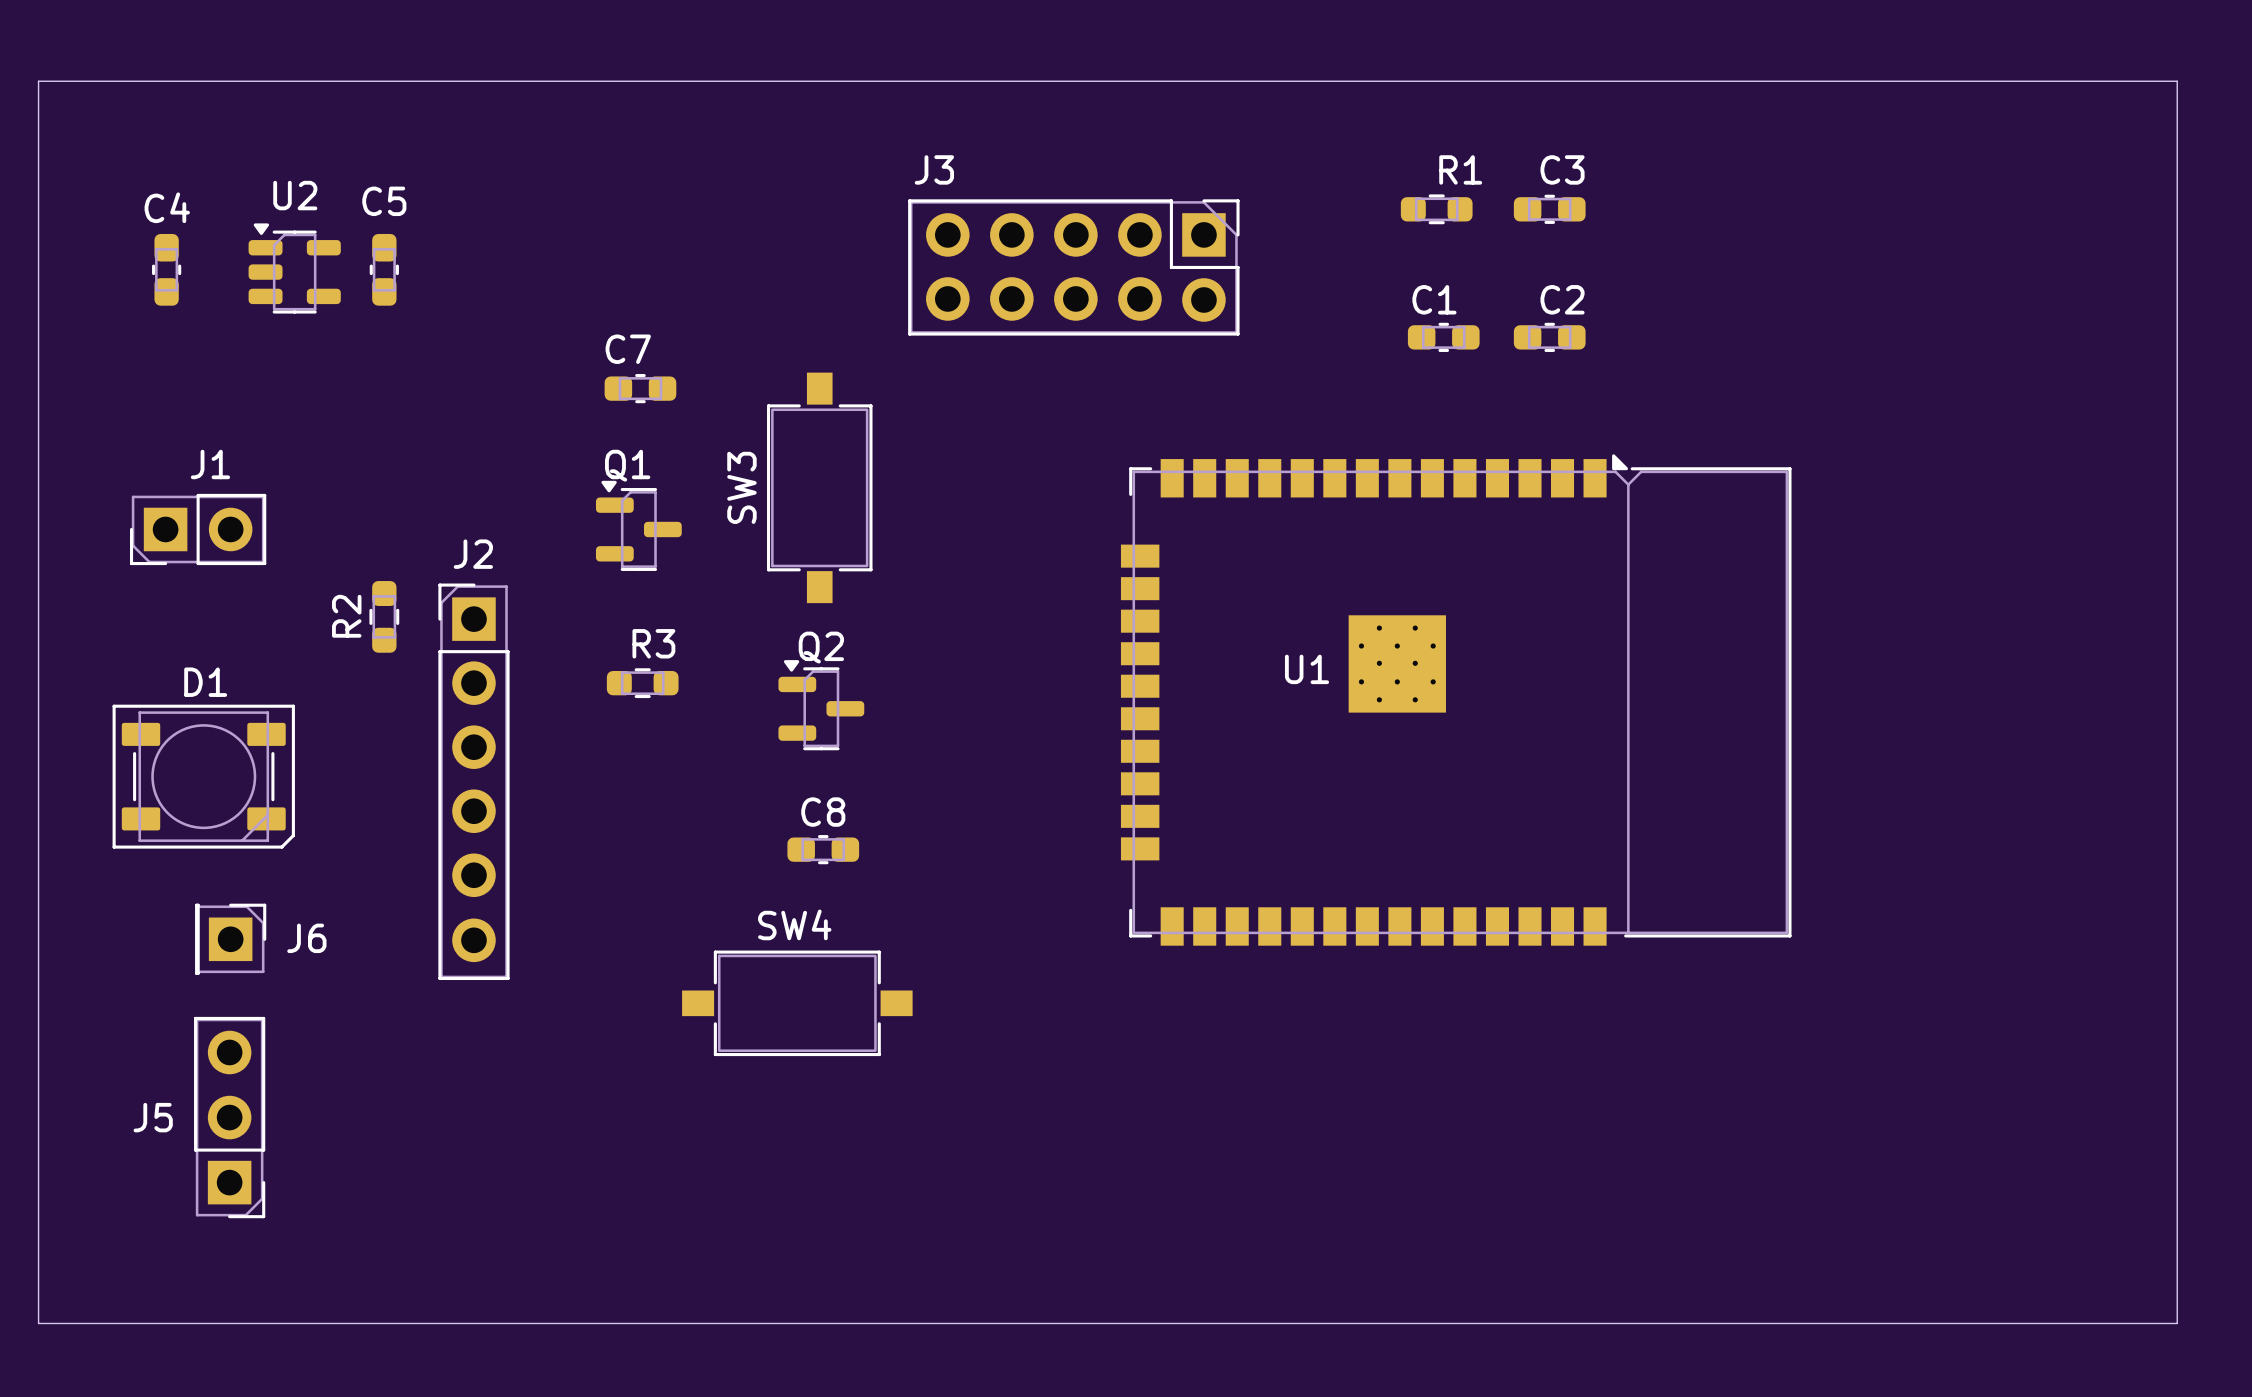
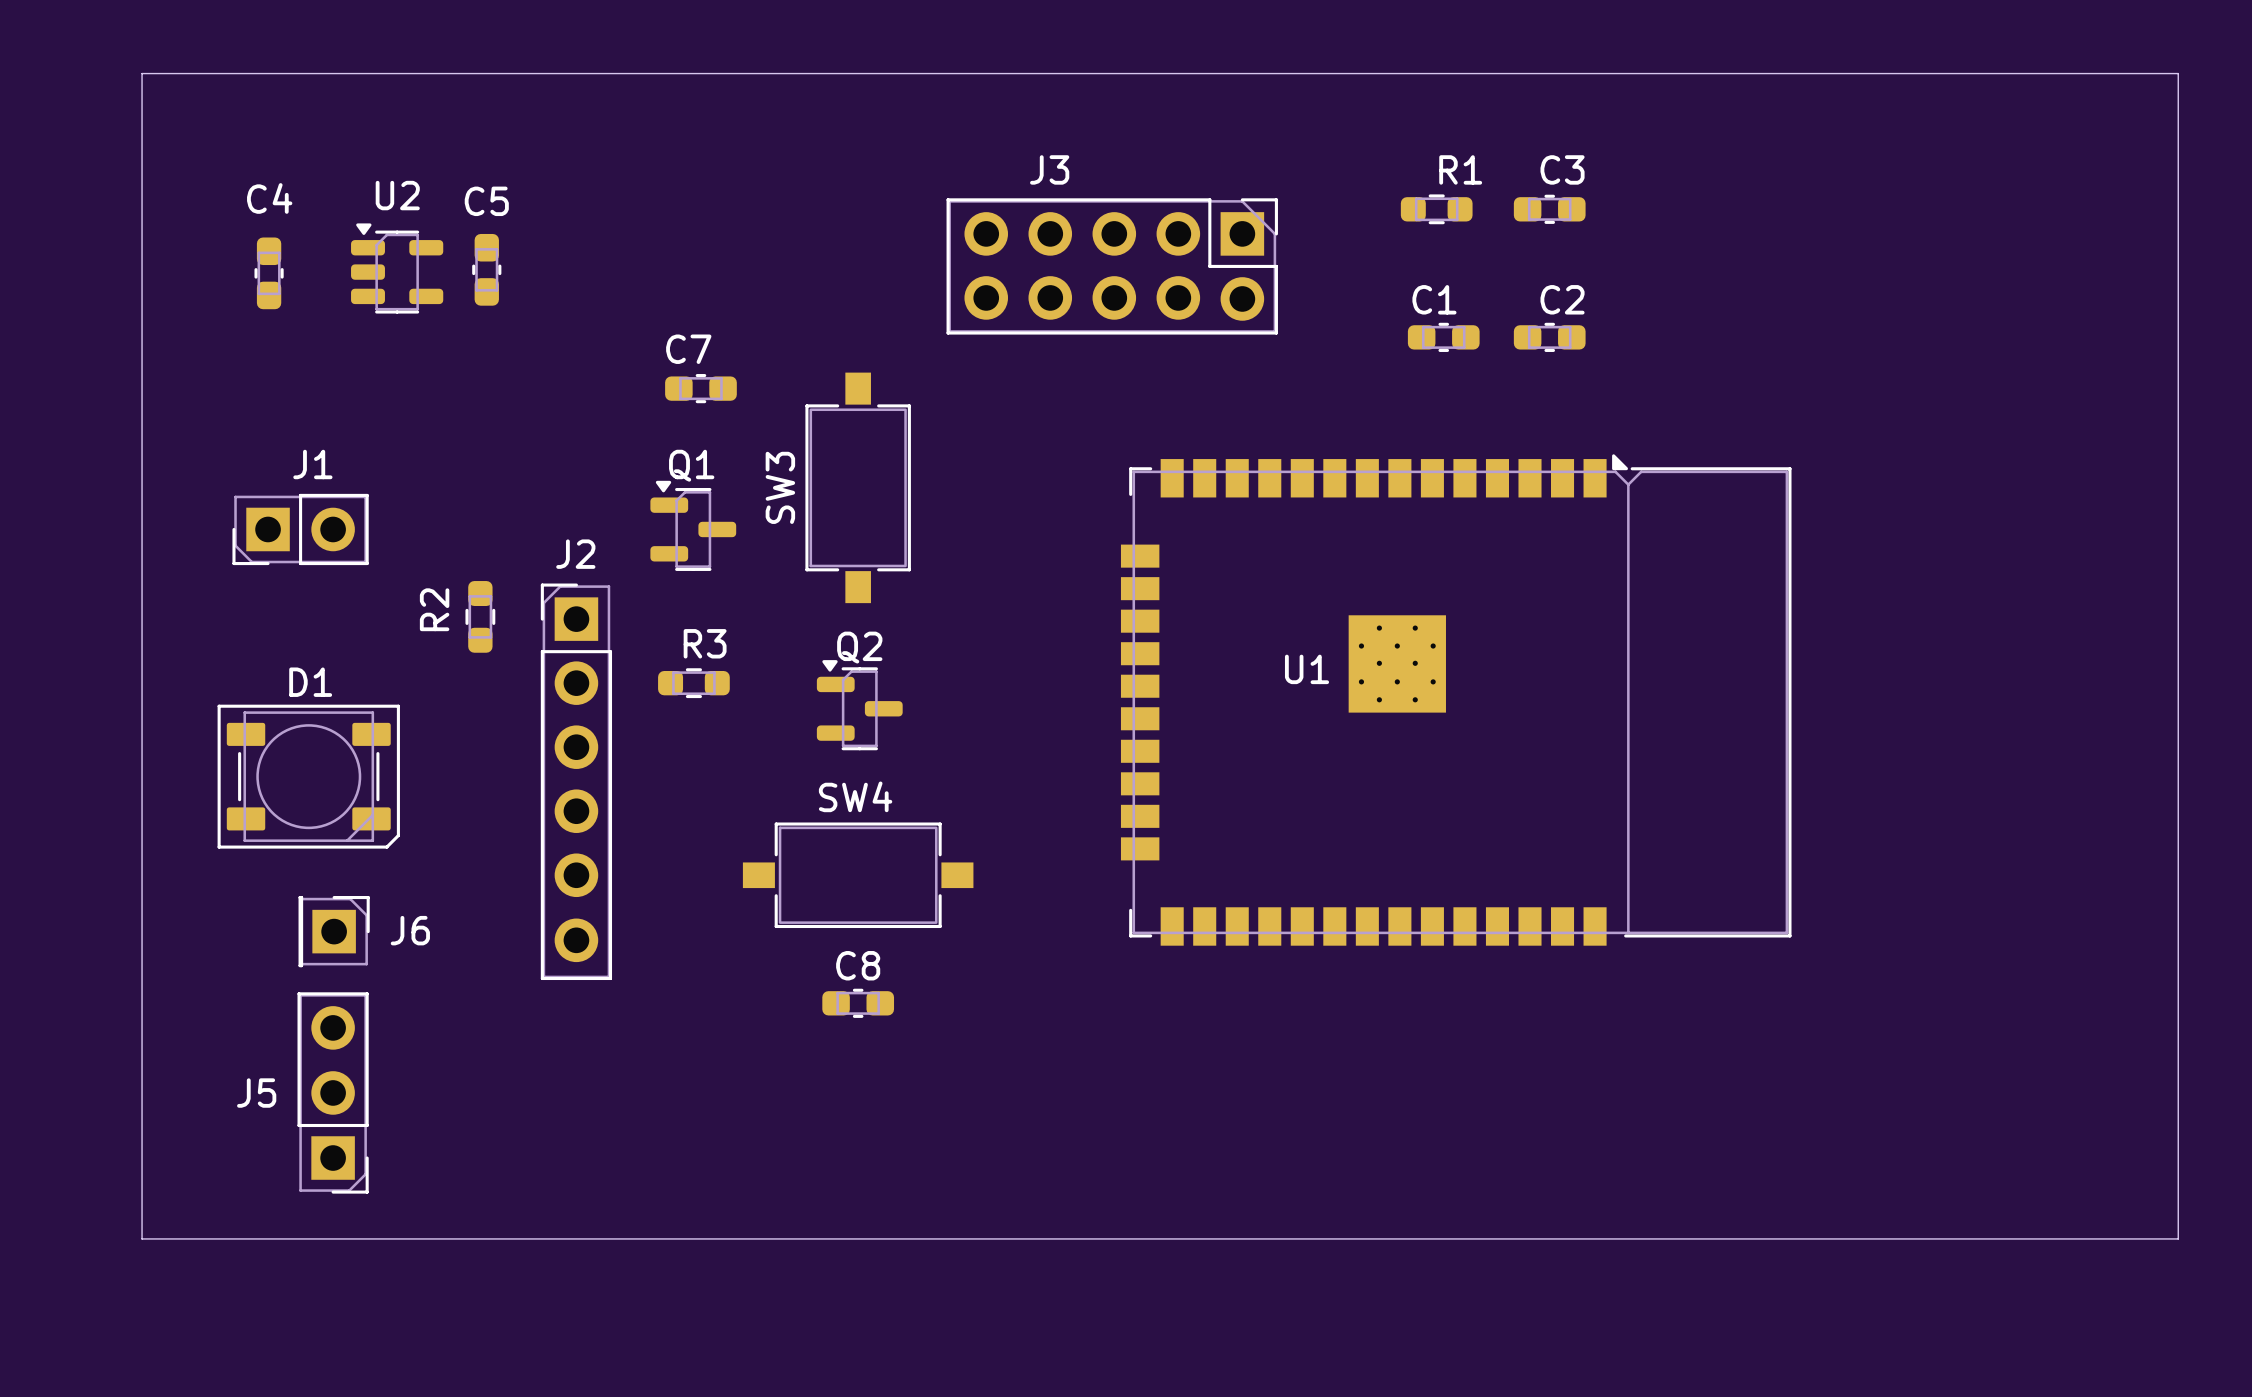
board edge: (38, 81) (2177, 81) (2177, 1323) (38, 1323) (38, 81) -> (142, 73) (142, 1238) (2178, 1238) (2178, 73) (142, 73)
text position: J3 (934, 169) -> J3 (1049, 169)
C4 name position: C4 (167, 207) -> C4 (269, 198)
part position: (1073, 267) -> (1112, 266)
U2 position: (294, 268) -> (397, 268)
C4 position: (166, 269) -> (269, 273)
C5 position: (384, 269) -> (486, 269)
C7 position: (640, 388) -> (700, 388)
Q1 name position: Q1 (627, 465) -> Q1 (691, 465)
SW3 position: (819, 487) -> (858, 487)
Q1 position: (638, 525) -> (693, 525)
J1 position: (198, 529) -> (300, 529)
R2 name position: R2 (346, 616) -> R2 (434, 609)
R2 position: (384, 616) -> (480, 616)
R3 position: (642, 683) -> (693, 683)
Q2 position: (821, 705) -> (859, 705)
D1 position: (203, 776) -> (308, 776)
J2 position: (473, 781) -> (576, 781)
C8 position: (823, 849) -> (858, 1003)
J6 position: (230, 939) -> (334, 931)
SW4 position: (797, 1003) -> (858, 875)
J5 position: (229, 1117) -> (333, 1092)

